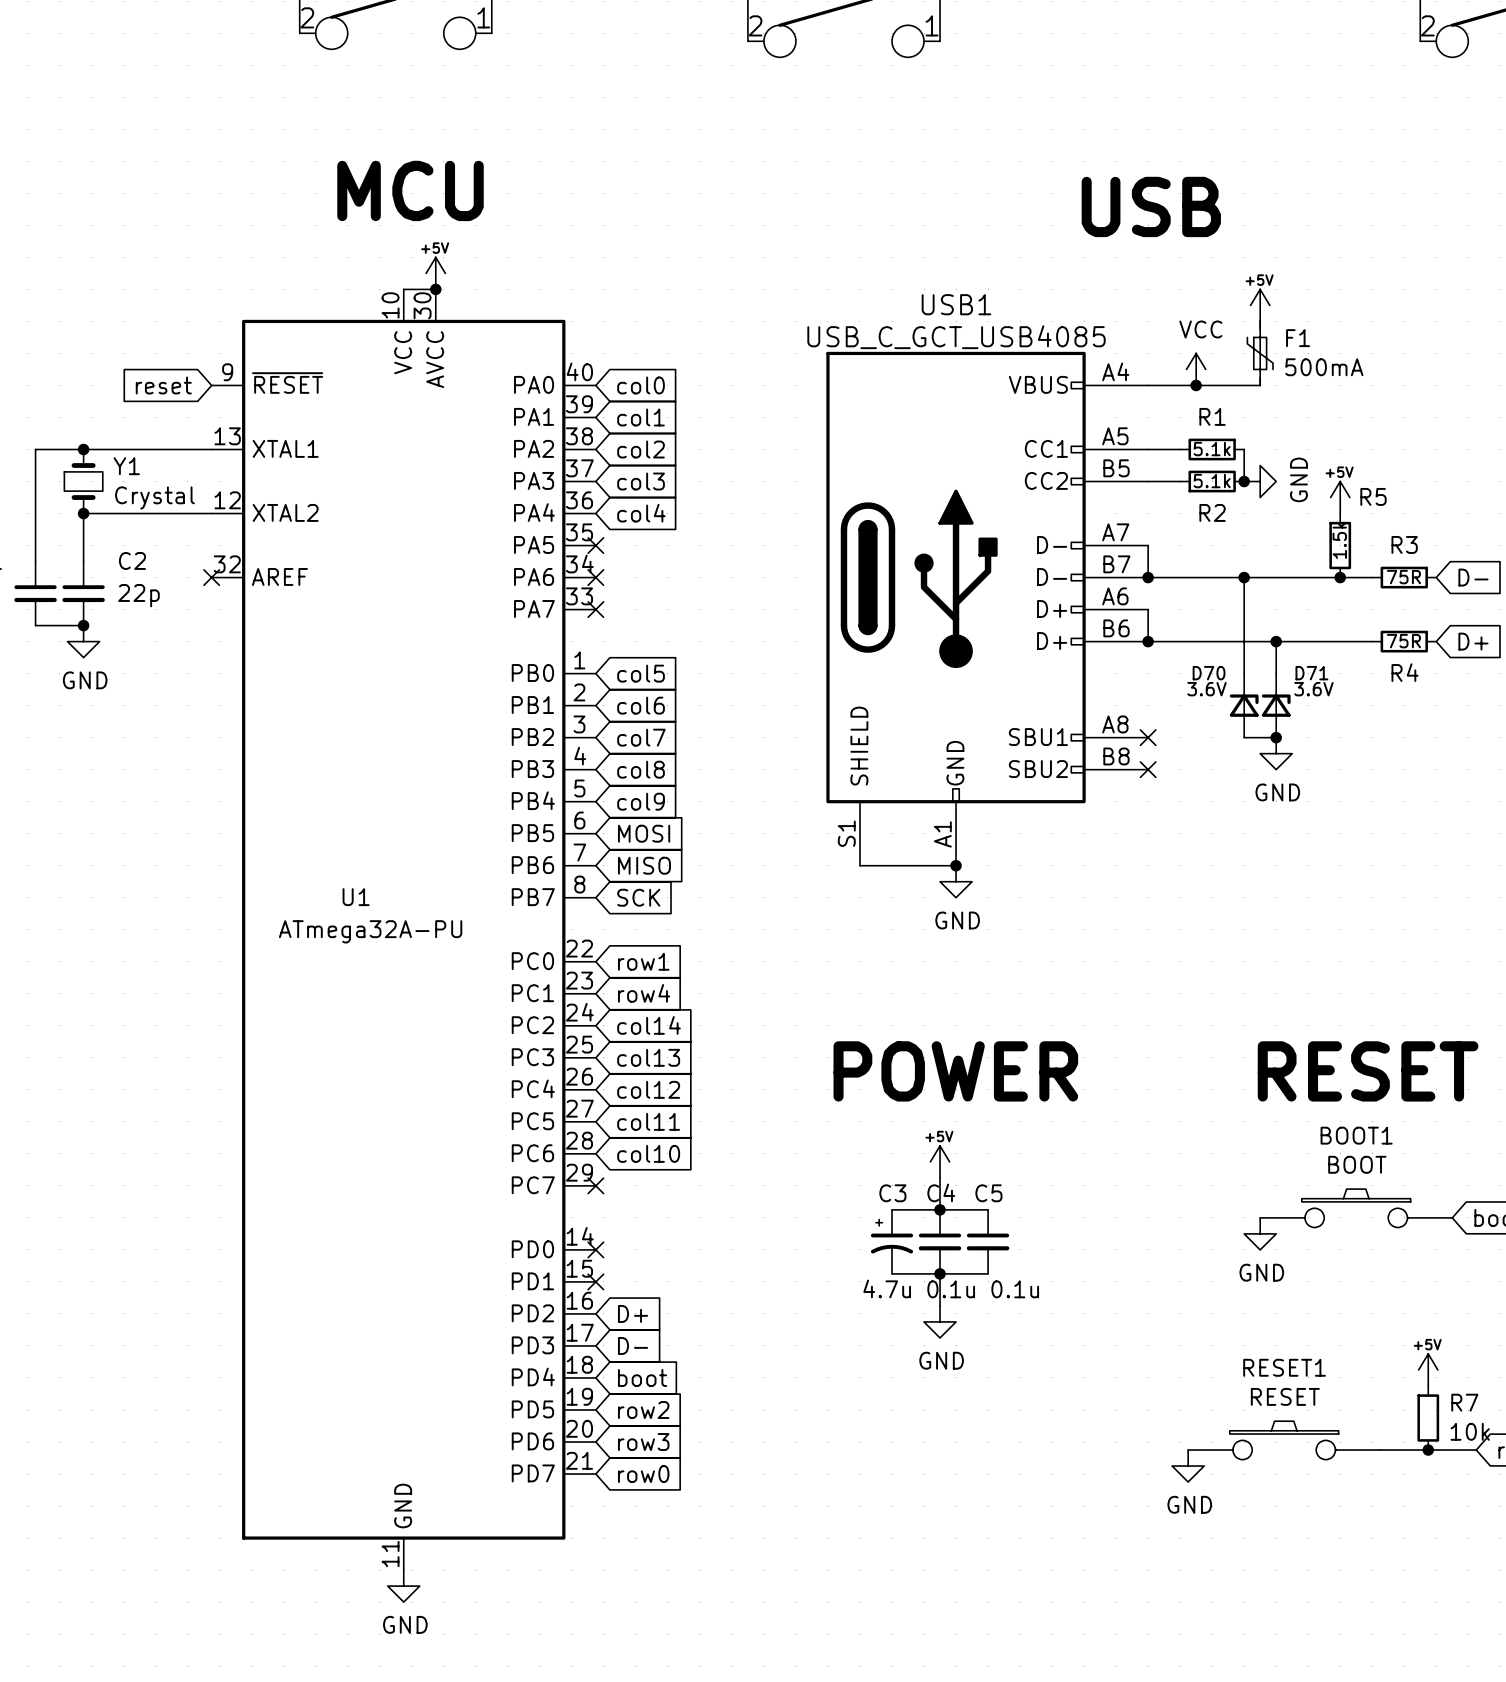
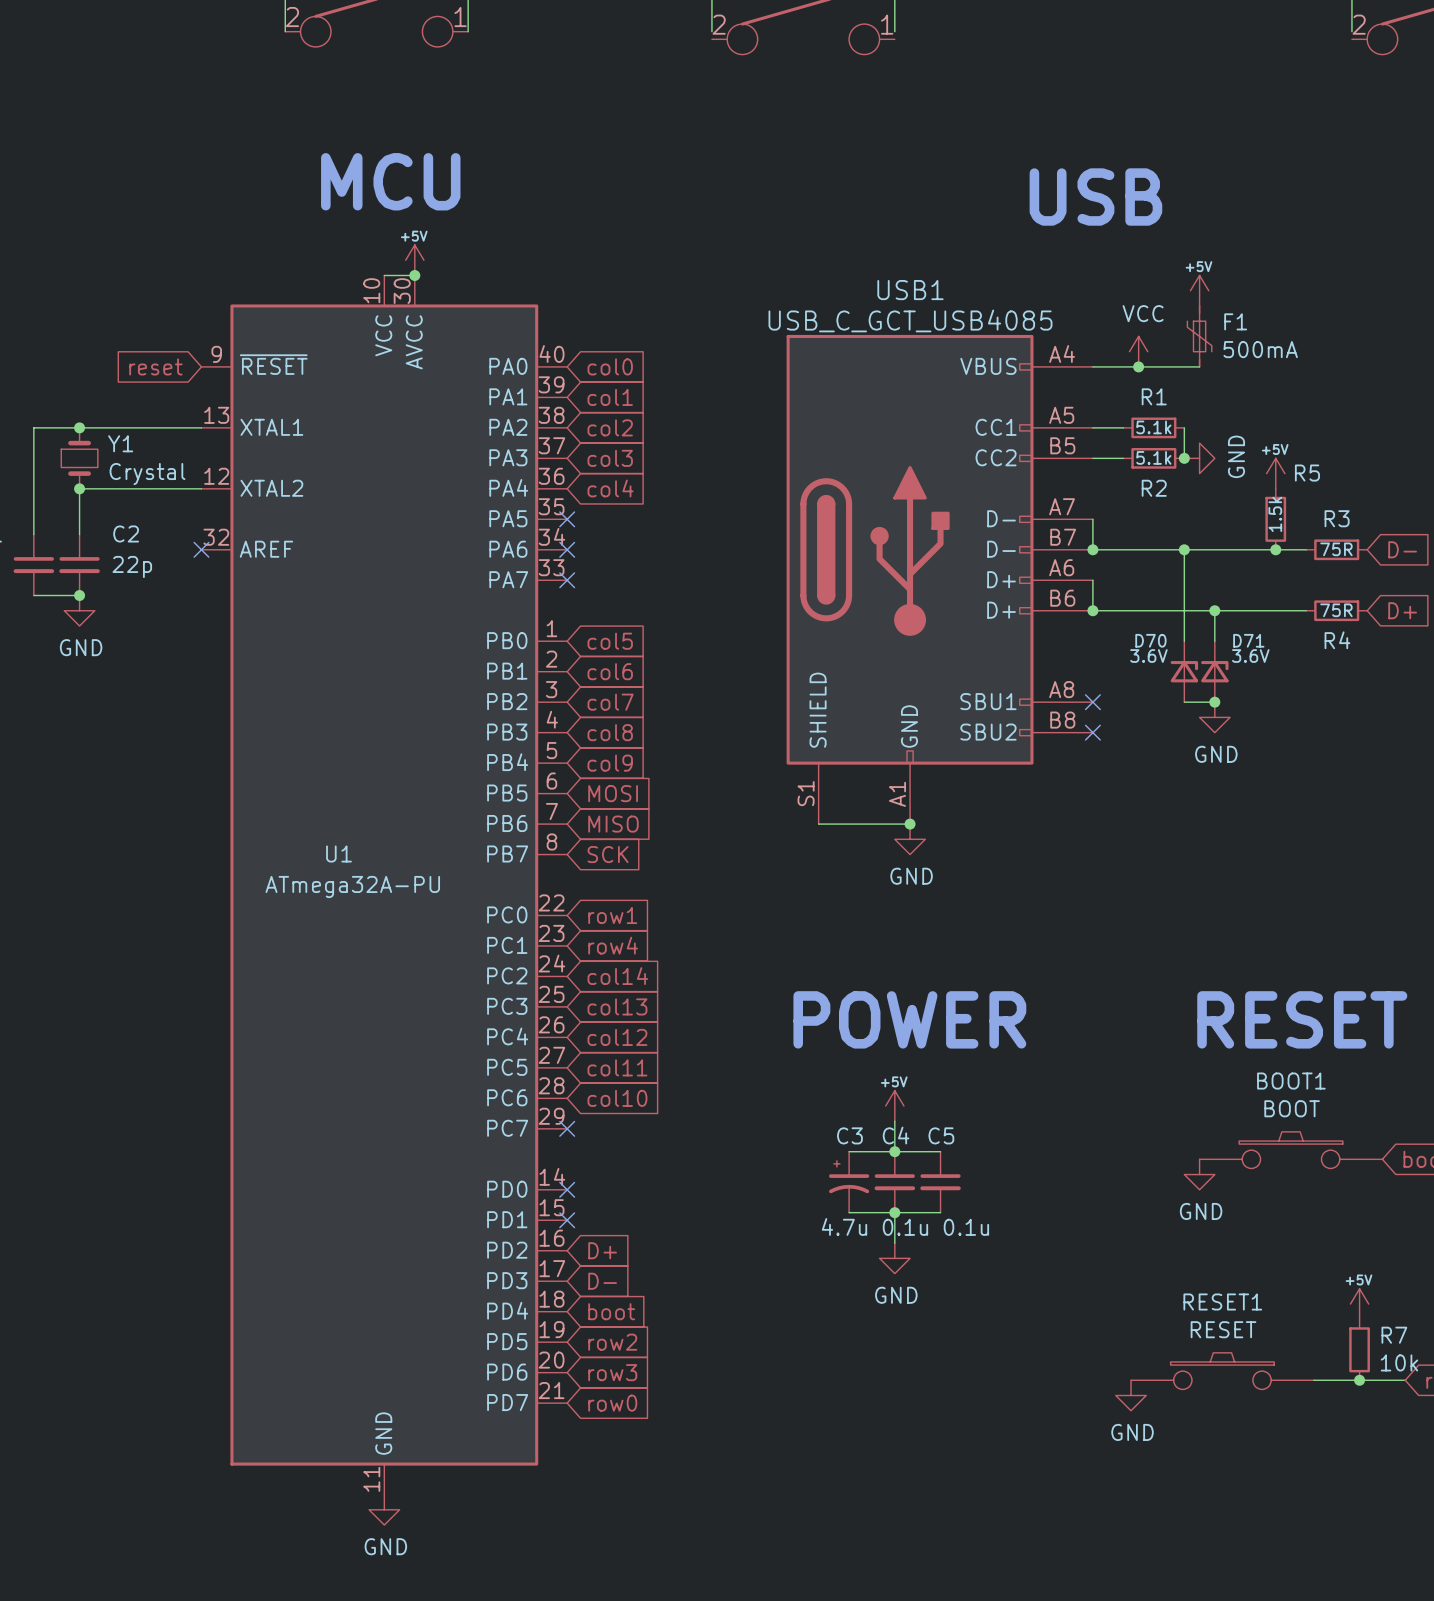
wire: (747, 33) (747, 41) -> none
wire: (940, 33) (940, 41) -> none
wire: (1420, 33) (1420, 41) -> none

